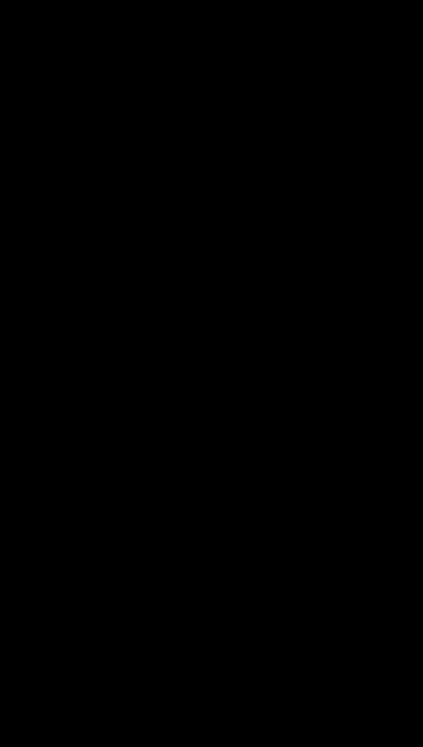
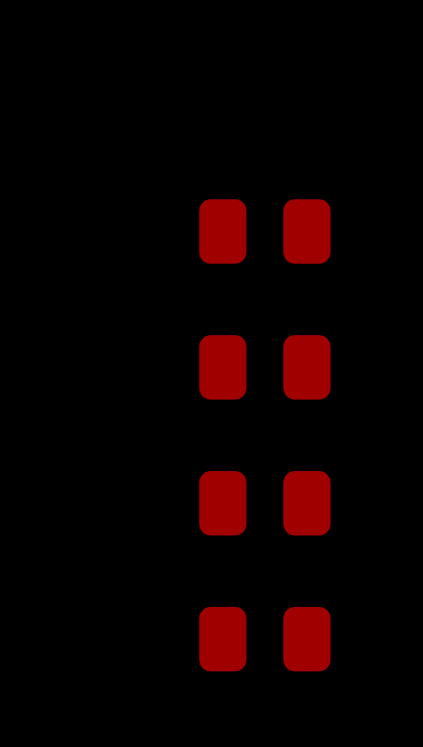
part: none -> (264, 231)
part: none -> (264, 367)
part: none -> (264, 503)
part: none -> (264, 639)

